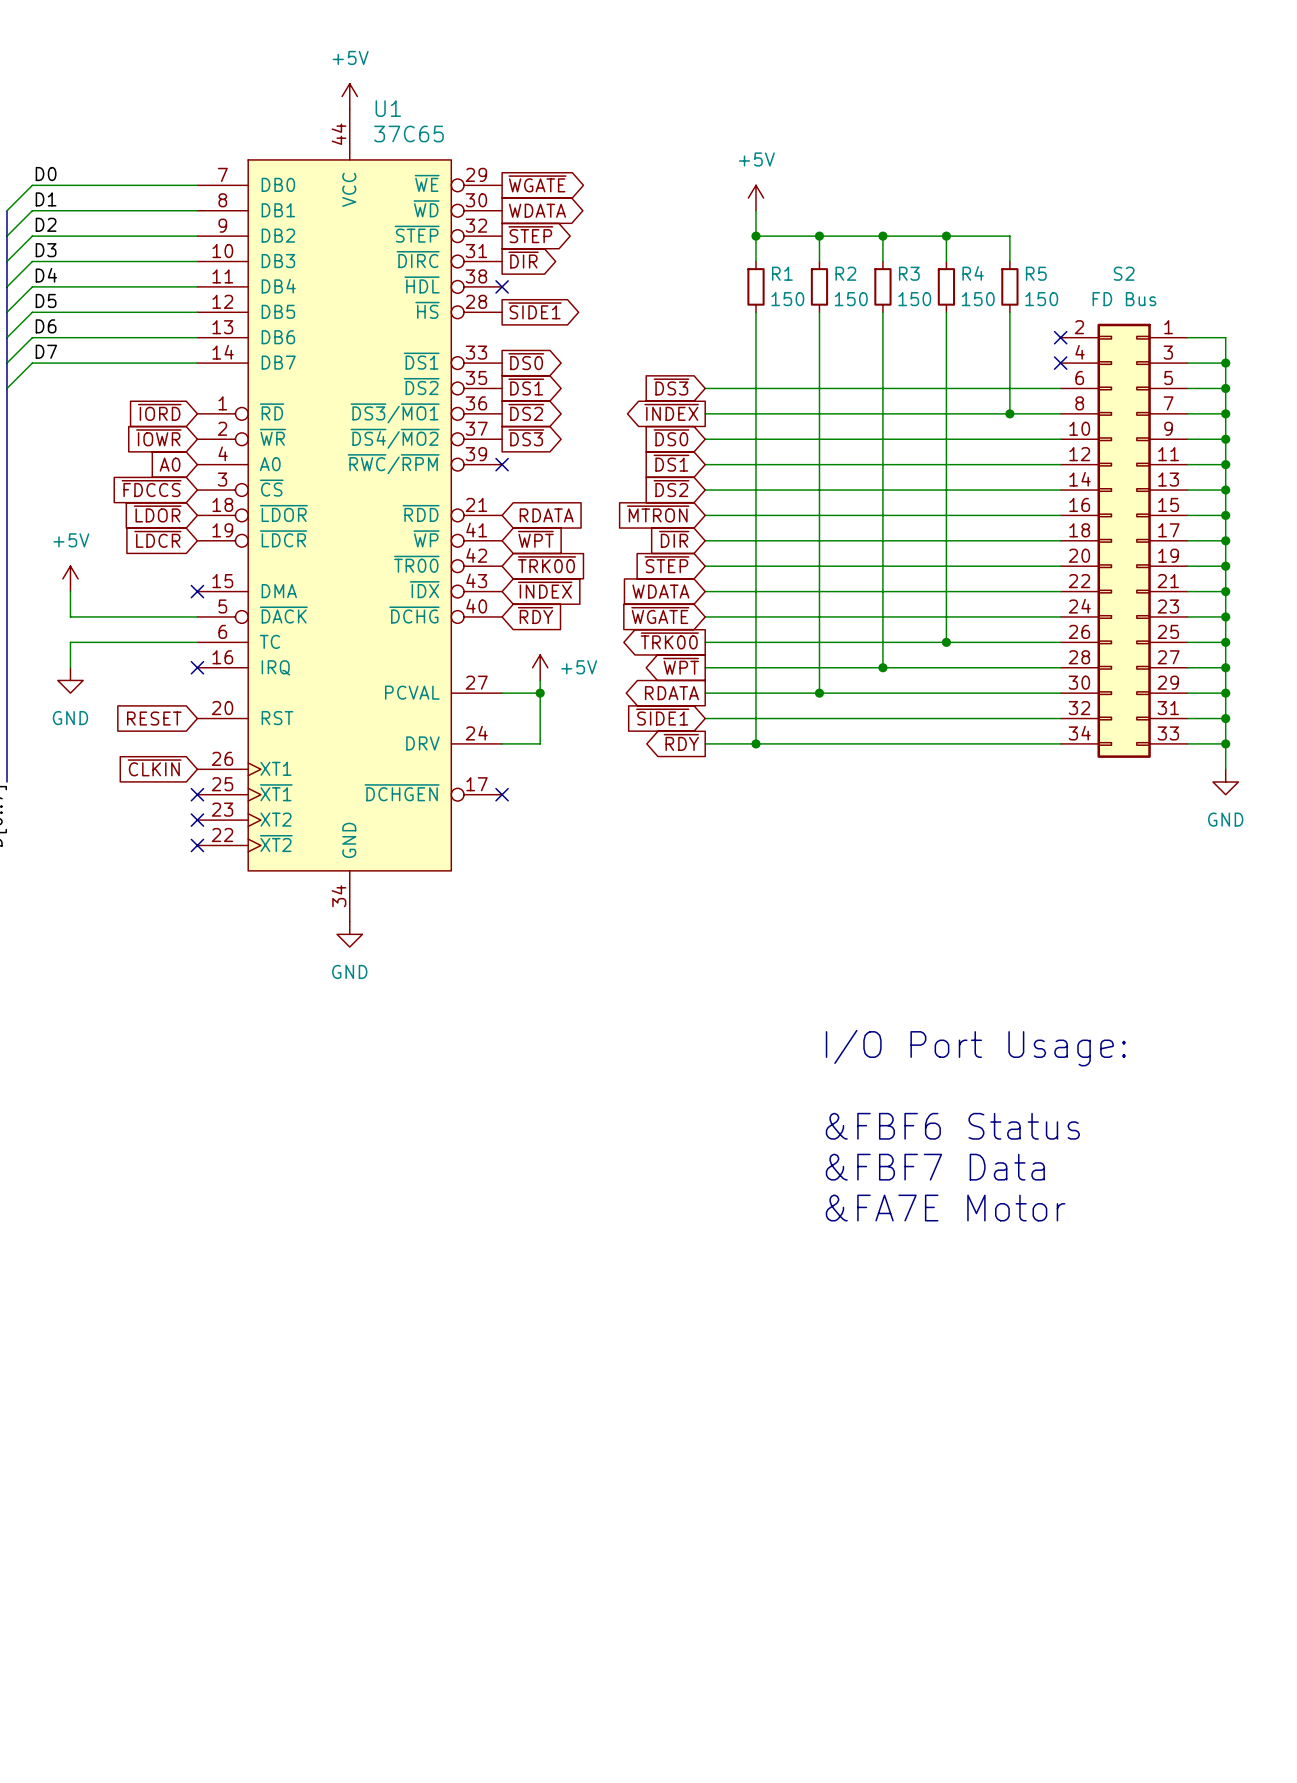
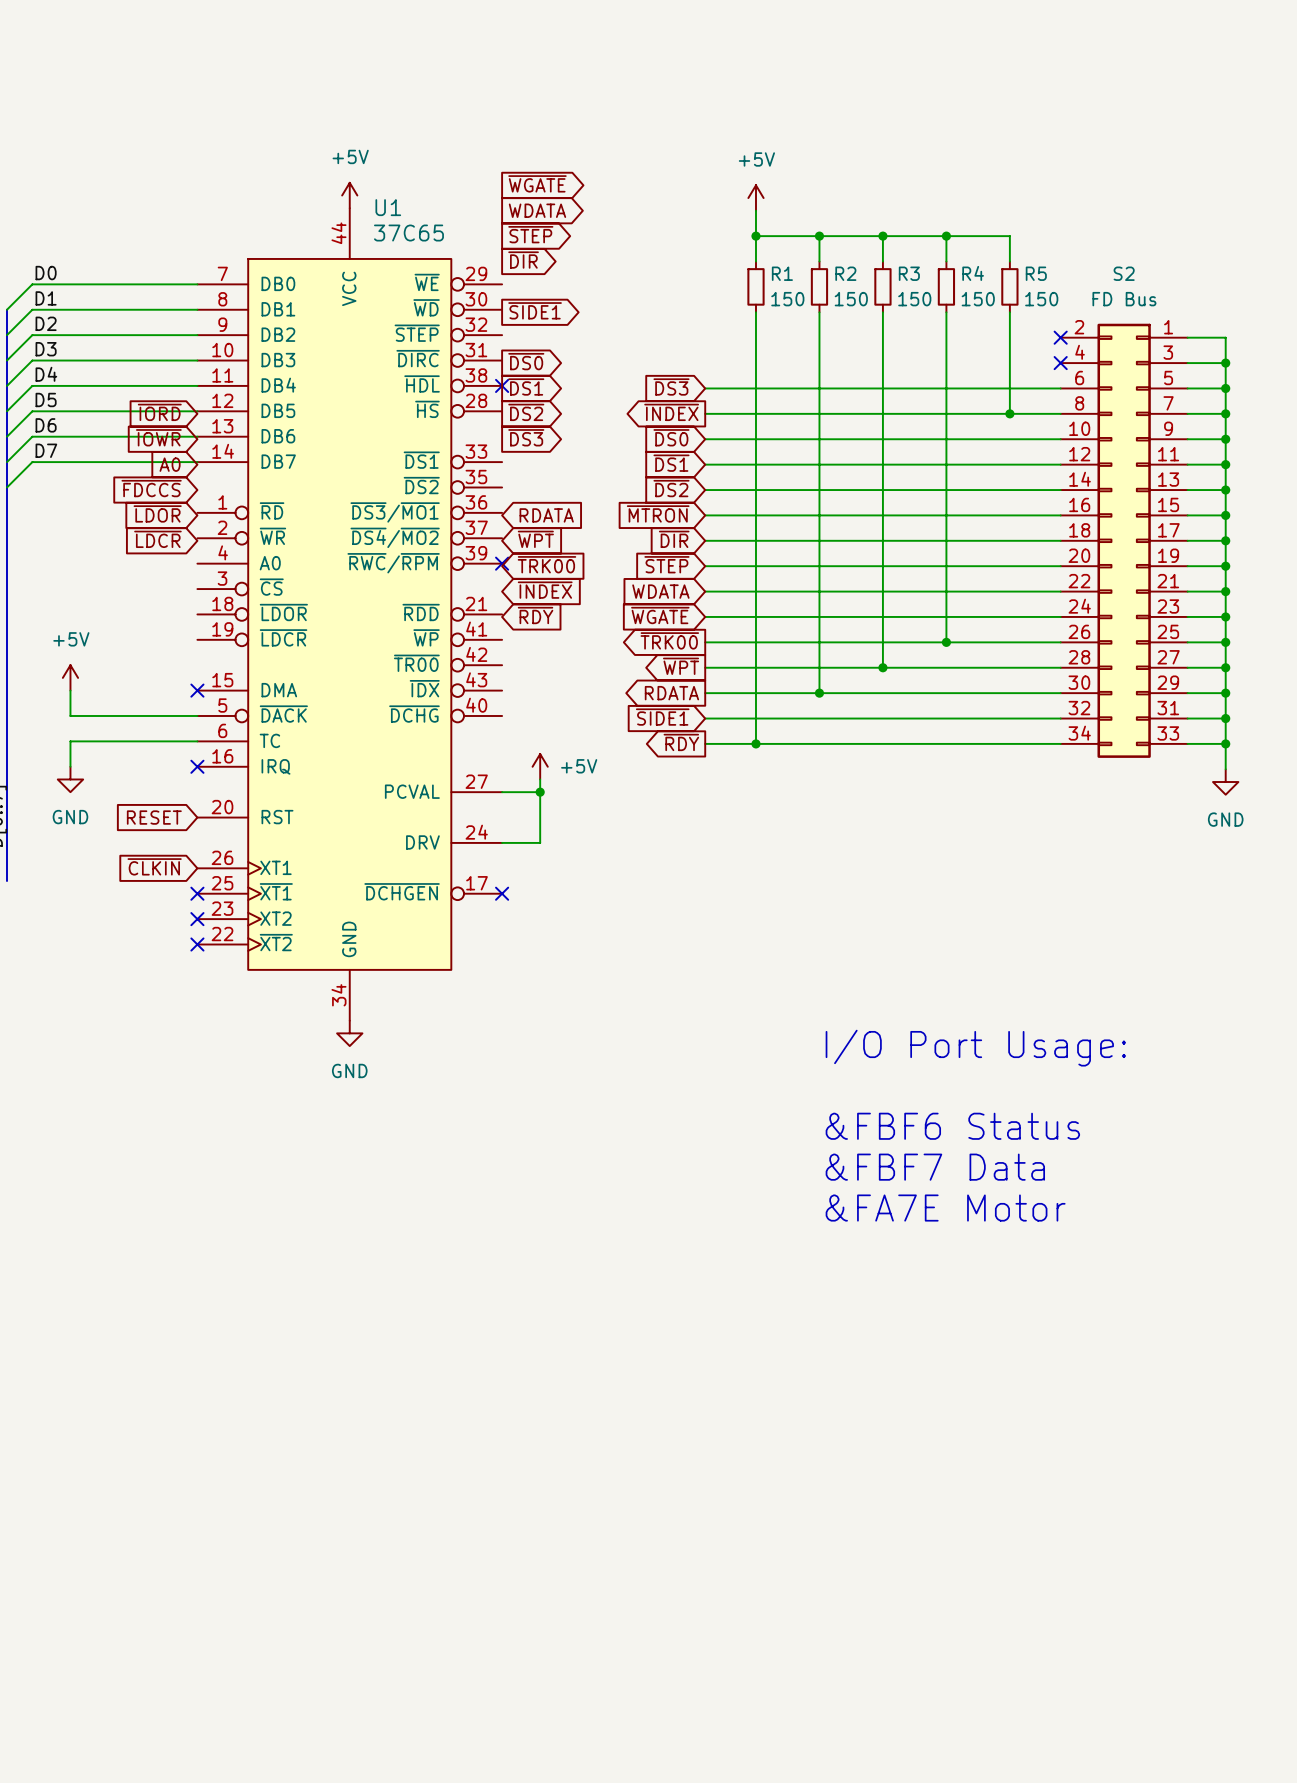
power symbol position: +5V (349, 96) -> +5V (349, 195)
label position: D0 (46, 174) -> D0 (46, 273)
wire: (197, 185) (32, 185) (6, 210) -> (197, 284) (32, 284) (6, 309)
label position: D1 (46, 199) -> D1 (46, 298)
bus: (6, 210) (6, 309) -> none
wire: (197, 210) (32, 210) (6, 236) -> (197, 309) (32, 309) (6, 335)
label position: D2 (46, 224) -> D2 (46, 323)
wire: (197, 236) (32, 236) (6, 261) -> (197, 335) (32, 335) (6, 360)
label position: D3 (46, 250) -> D3 (46, 349)
wire: (197, 261) (32, 261) (6, 286) -> (197, 360) (32, 360) (6, 385)
label position: D4 (46, 275) -> D4 (46, 374)
wire: (197, 286) (32, 286) (6, 312) -> (197, 385) (32, 385) (6, 411)
no-connect mark: (502, 286) -> none
label position: D5 (46, 300) -> D5 (46, 399)
wire: (197, 312) (32, 312) (6, 337) -> (197, 411) (32, 411) (6, 436)
label position: D6 (46, 326) -> D6 (46, 425)
wire: (197, 337) (32, 337) (6, 363) -> (197, 436) (32, 436) (6, 462)
label position: D7 (46, 351) -> D7 (46, 450)
wire: (197, 363) (32, 363) (6, 388) -> (197, 462) (32, 462) (6, 487)
no-connect mark: none -> (502, 385)
no-connect mark: (502, 464) -> none
U1 position: (349, 515) -> (349, 614)
no-connect mark: none -> (502, 563)
power symbol: +5V (70, 578) -> none
wire: (70, 591) (70, 616) (197, 616) -> (70, 690) (70, 715) (197, 715)
no-connect mark: (197, 591) -> none
wire: (197, 642) (70, 642) (70, 667) -> (197, 741) (70, 741) (70, 766)
no-connect mark position: (197, 667) -> (197, 690)
power symbol position: +5V (540, 667) -> +5V (540, 766)
power symbol: GND (70, 680) -> +5V (70, 677)
wire: (540, 680) (540, 743) (502, 743) -> (540, 779) (540, 842) (502, 842)
wire: (502, 693) (540, 693) -> (502, 792) (540, 792)
junction: (540, 693) -> none
global label position: RESET (154, 718) -> RESET (154, 817)
no-connect mark: none -> (197, 766)
global label position: ~{CLKIN} (154, 767) -> ~{CLKIN} (154, 866)
power symbol: none -> GND (70, 779)
bus: none -> (6, 782) (6, 881)
junction: none -> (540, 792)
no-connect mark: (197, 794) -> none
no-connect mark: (502, 794) -> none
no-connect mark: (197, 820) -> none
no-connect mark: (197, 845) -> none
no-connect mark: none -> (197, 893)
no-connect mark: none -> (502, 893)
no-connect mark: none -> (197, 919)
power symbol position: GND (349, 934) -> GND (349, 1033)
no-connect mark: none -> (197, 944)

